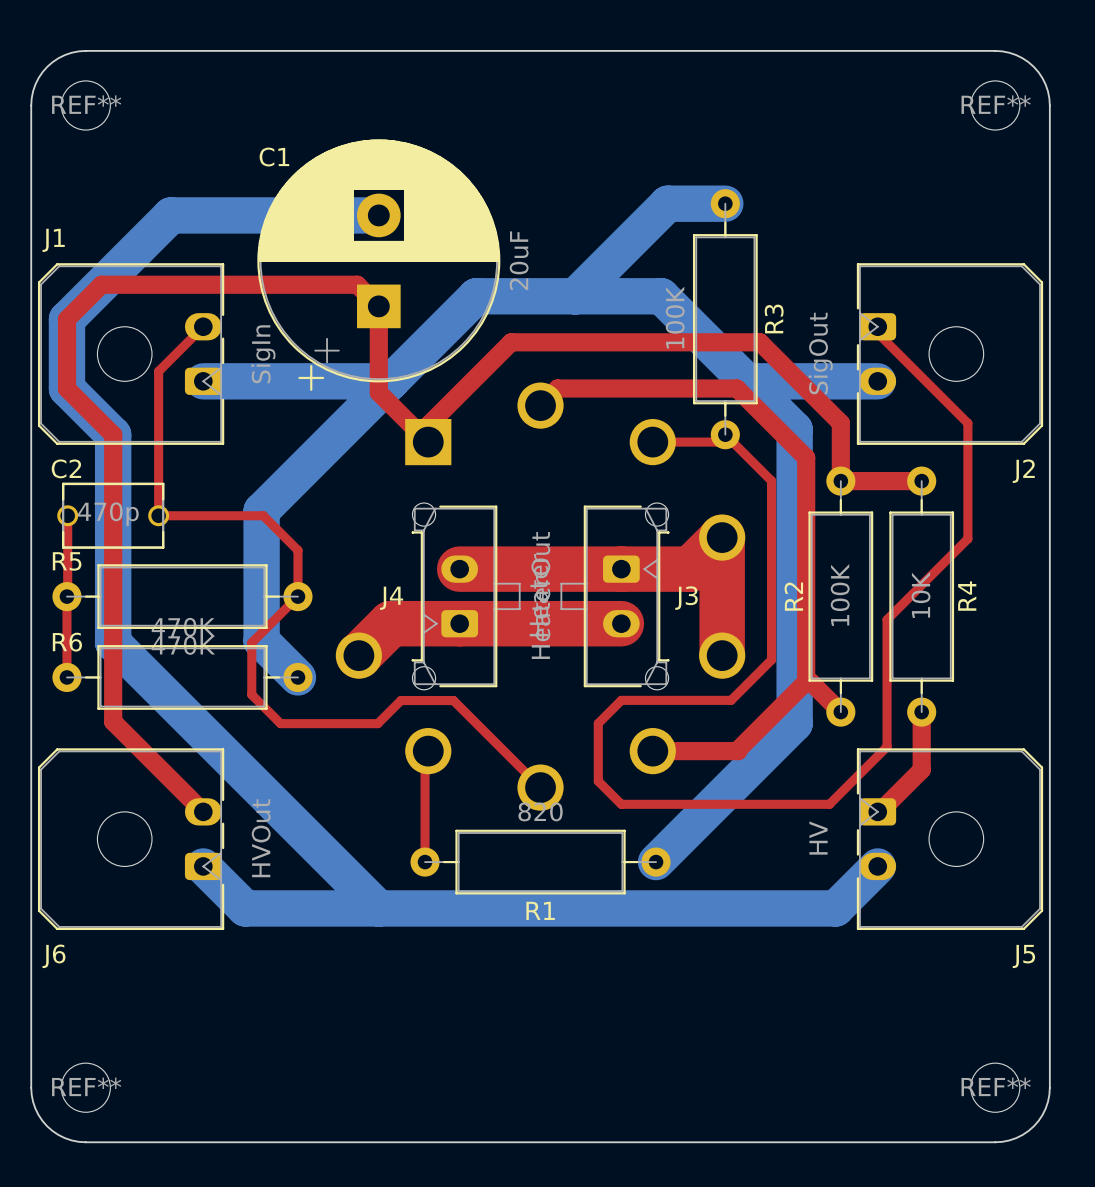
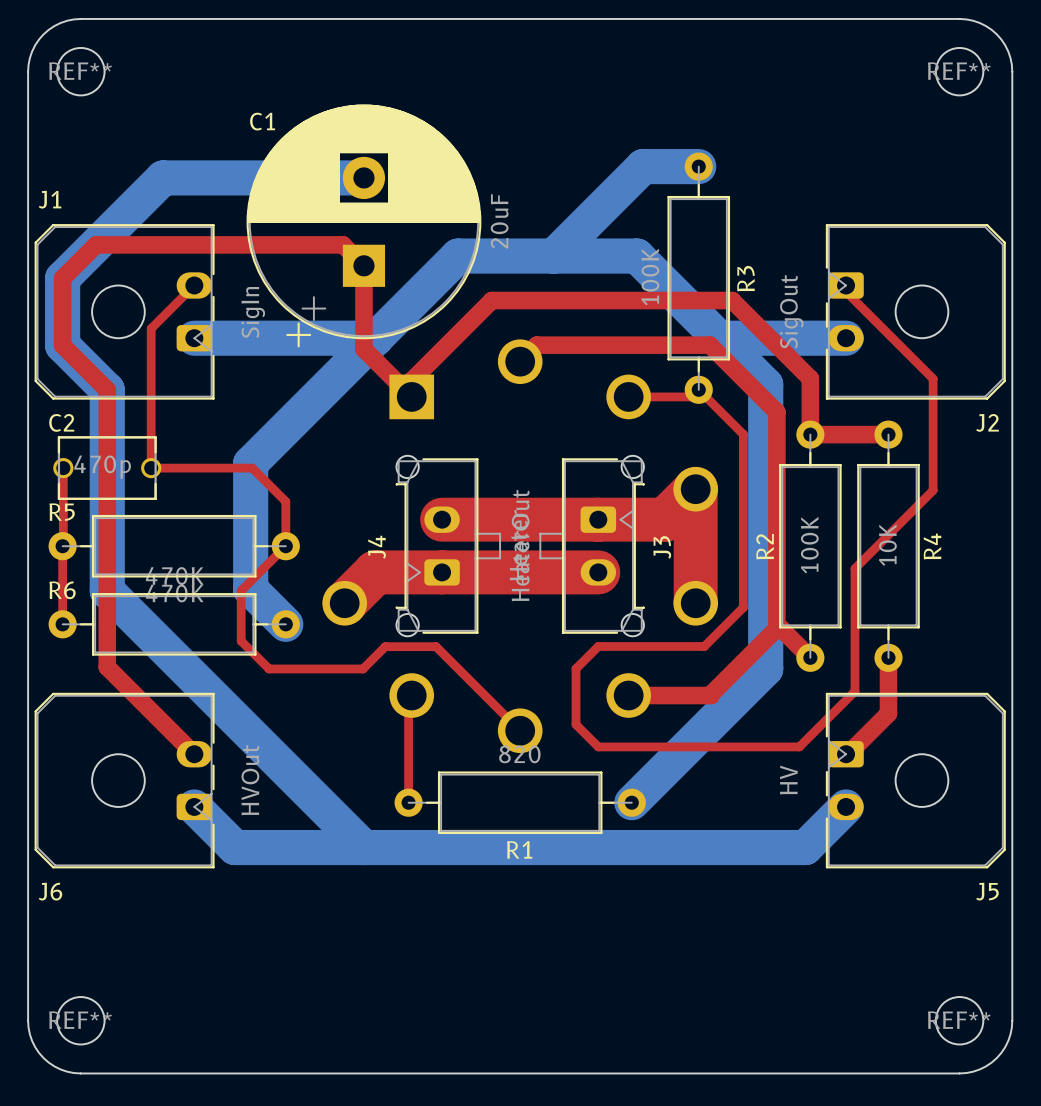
J4 name rotation: 0° (391, 598) -> 90° counterclockwise (377, 547)
J3 name rotation: 0° (686, 598) -> 90° counterclockwise (662, 547)

